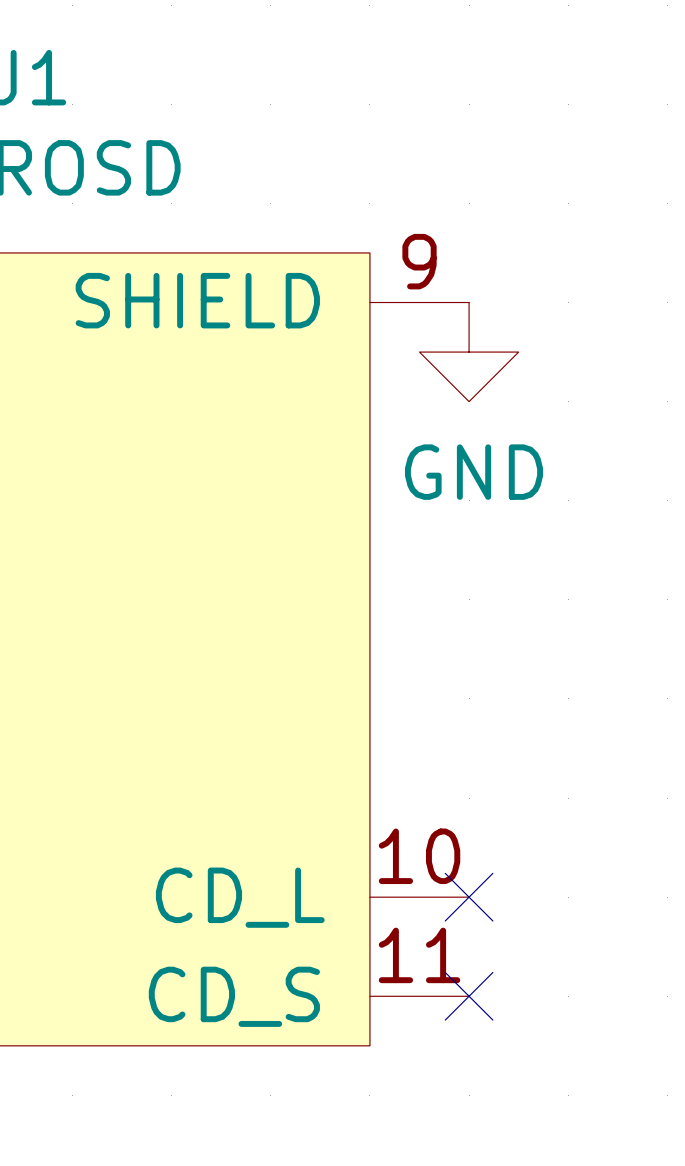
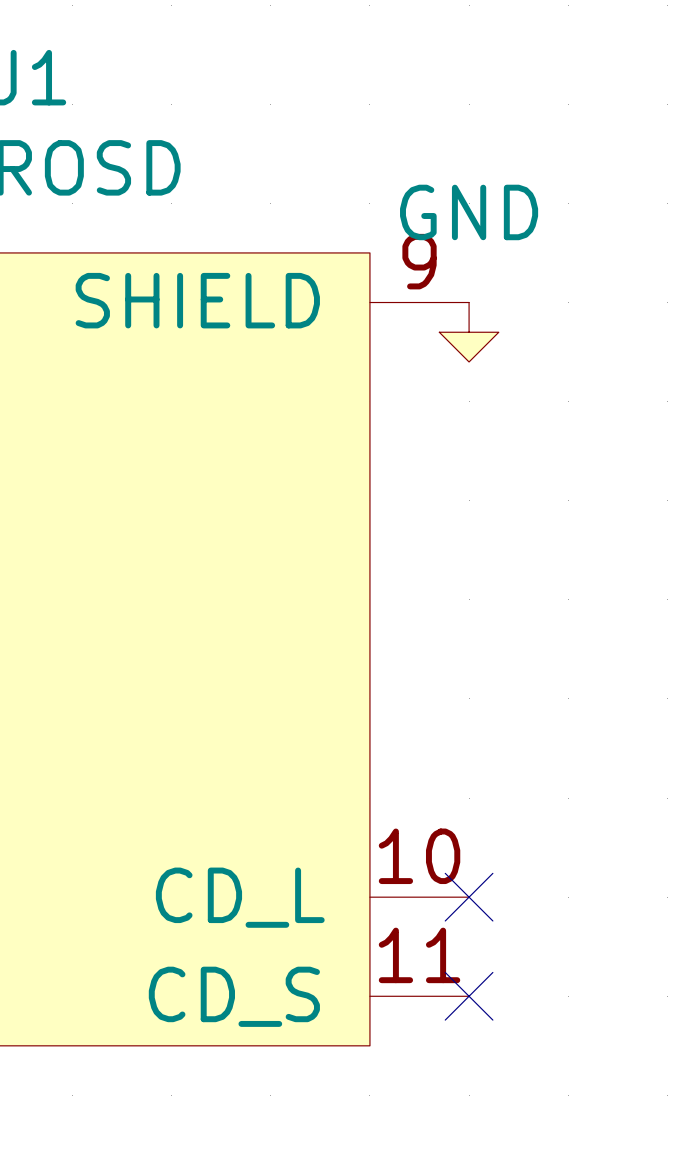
power symbol shape: [419, 302, 519, 402] -> [439, 302, 499, 362]
power symbol text position: GND (474, 472) -> GND (469, 212)

